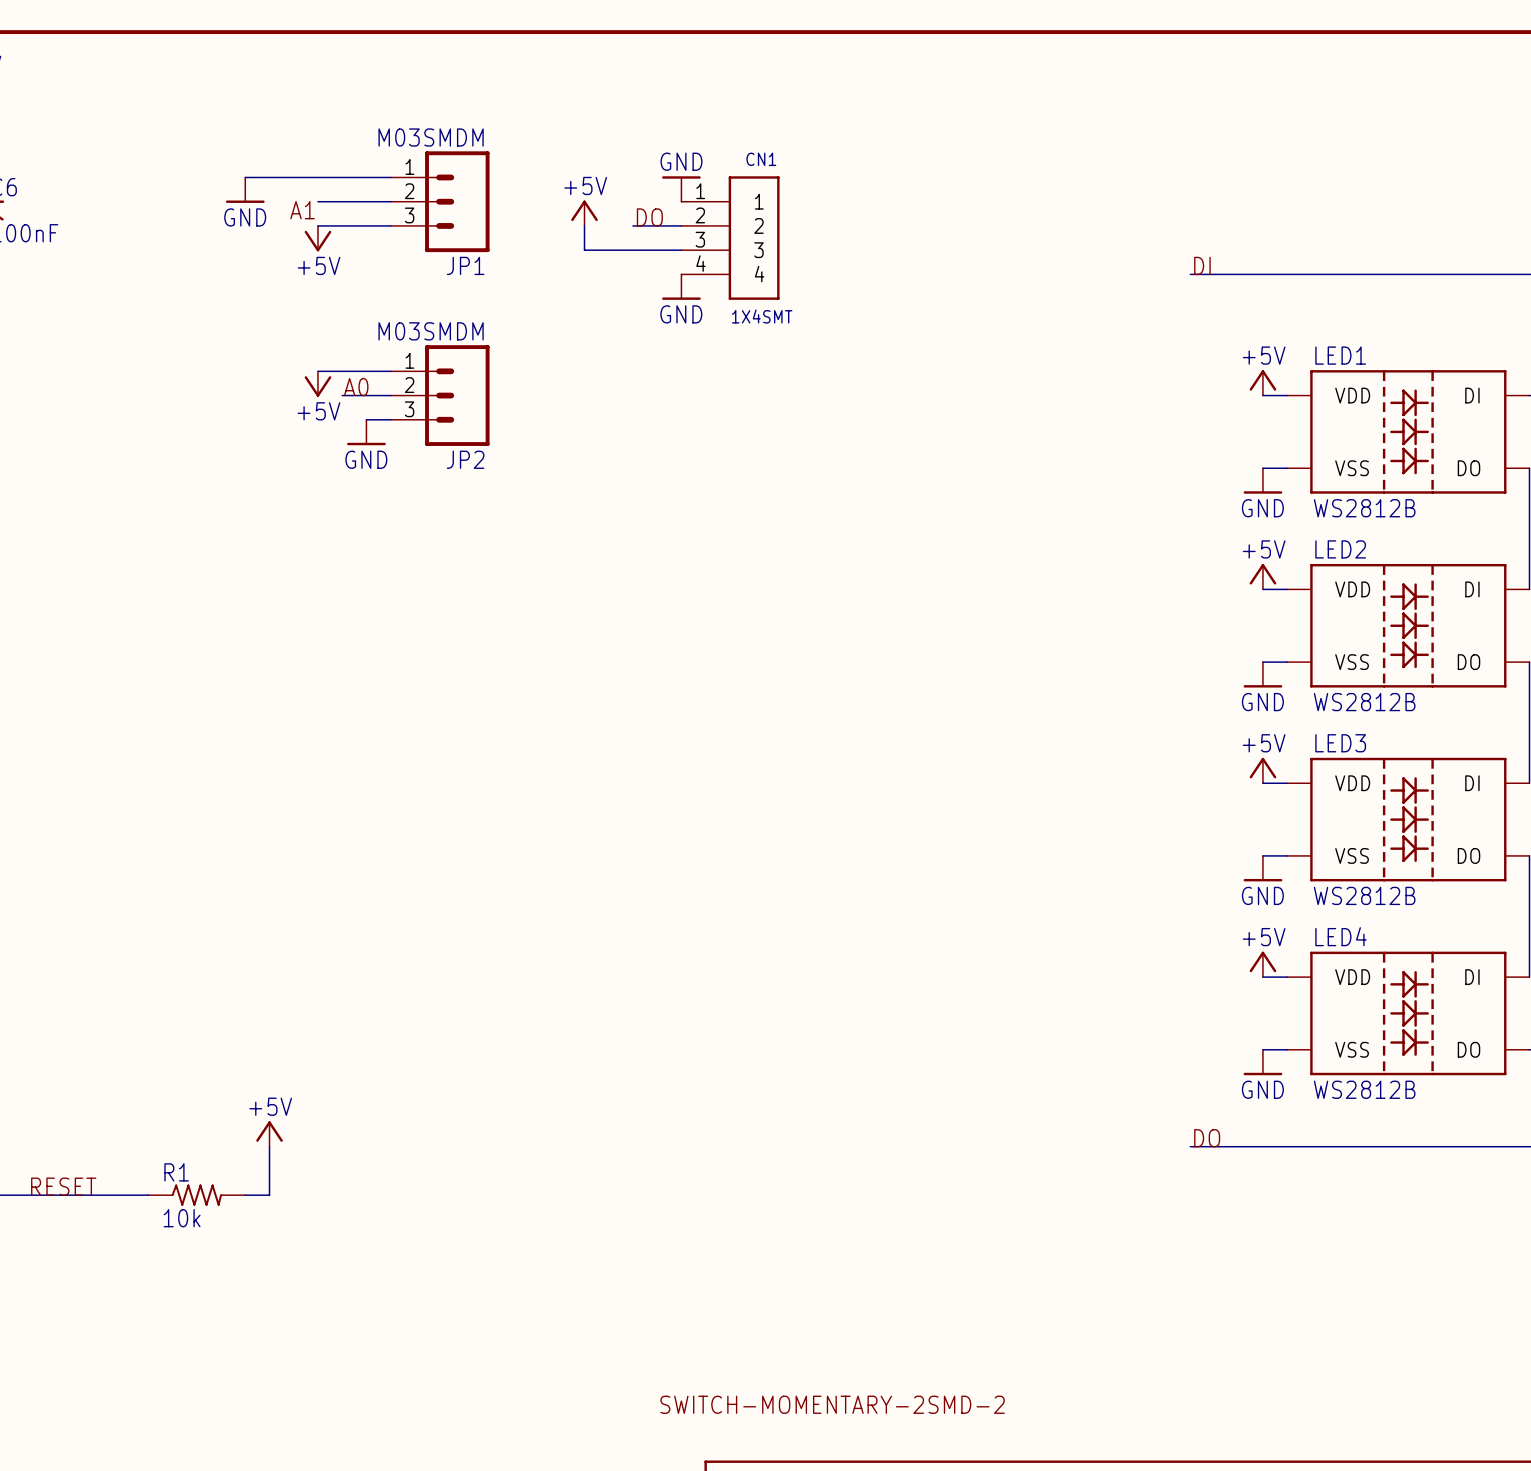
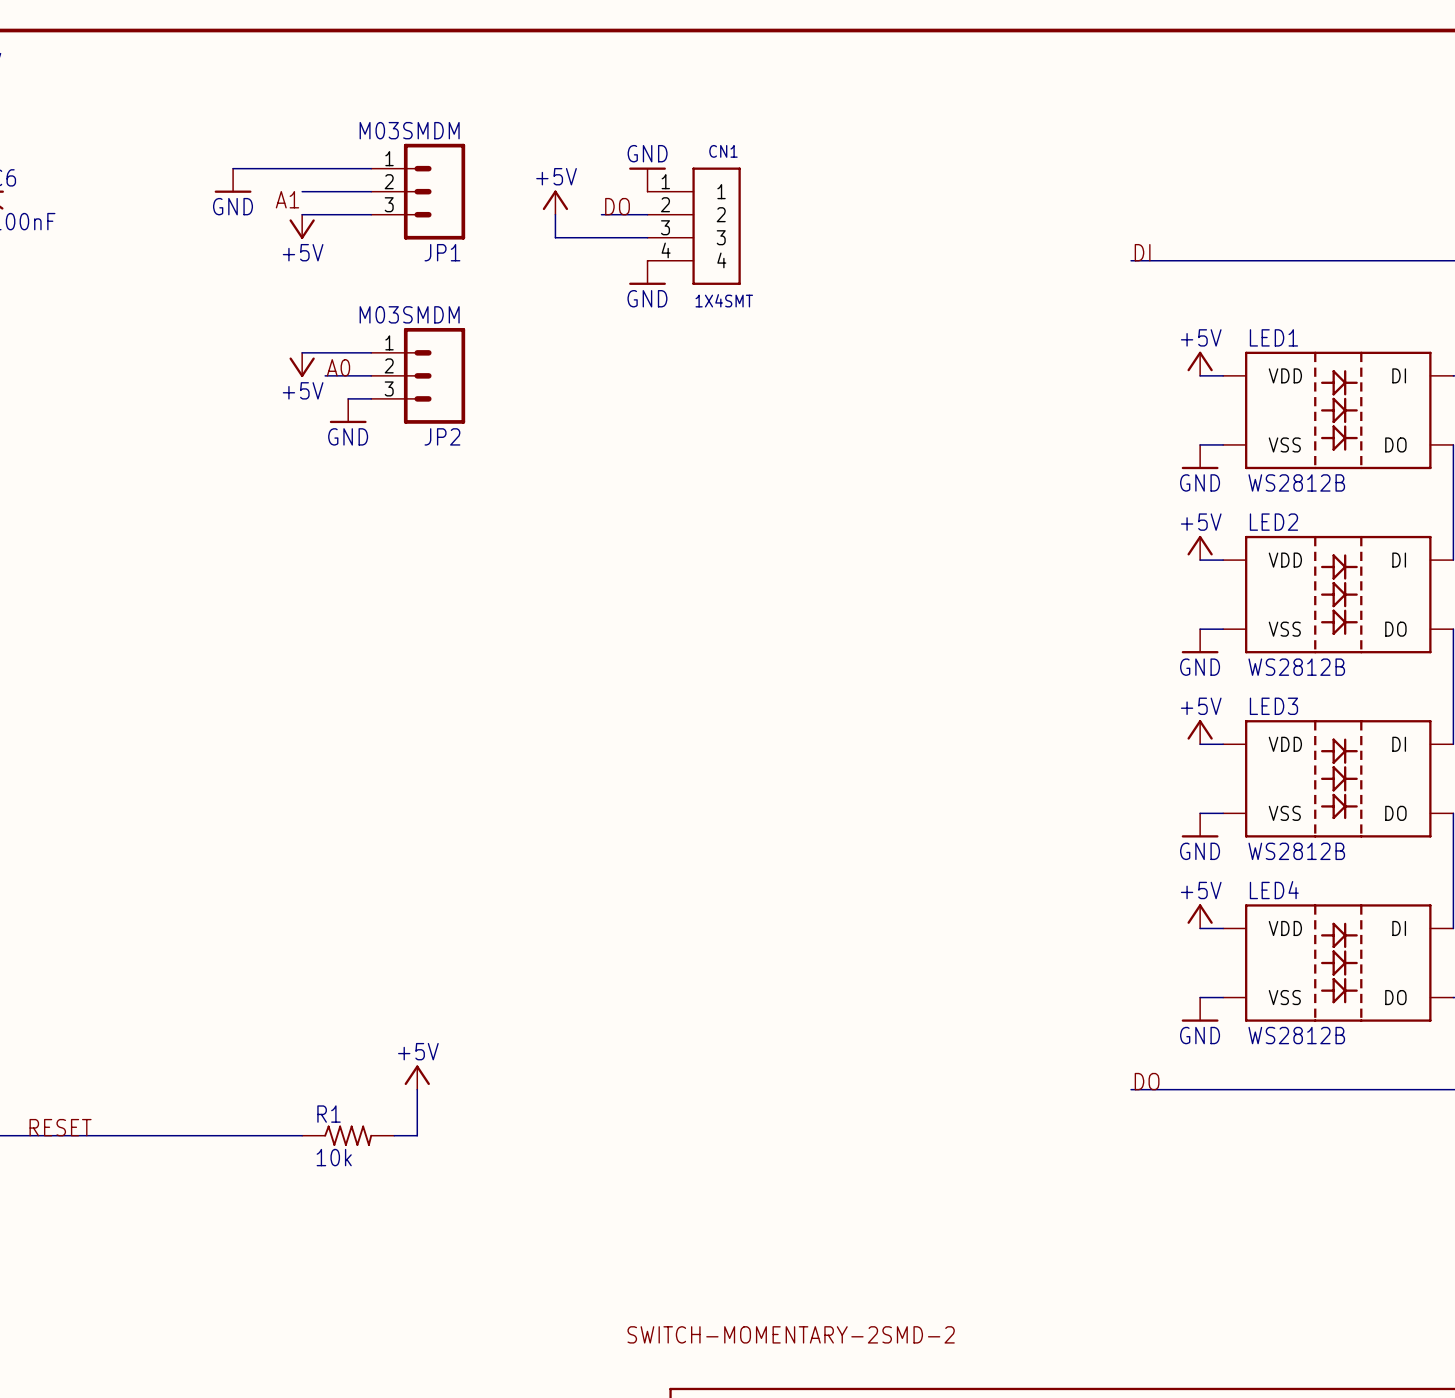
power symbol position: +5V (269, 1133) -> +5V (417, 1077)
wire: (269, 1146) (269, 1195) -> (302, 1135) (256, 1135)
wire: none -> (417, 1089) (417, 1135) (394, 1135)
R1 position: (196, 1195) -> (348, 1135)

